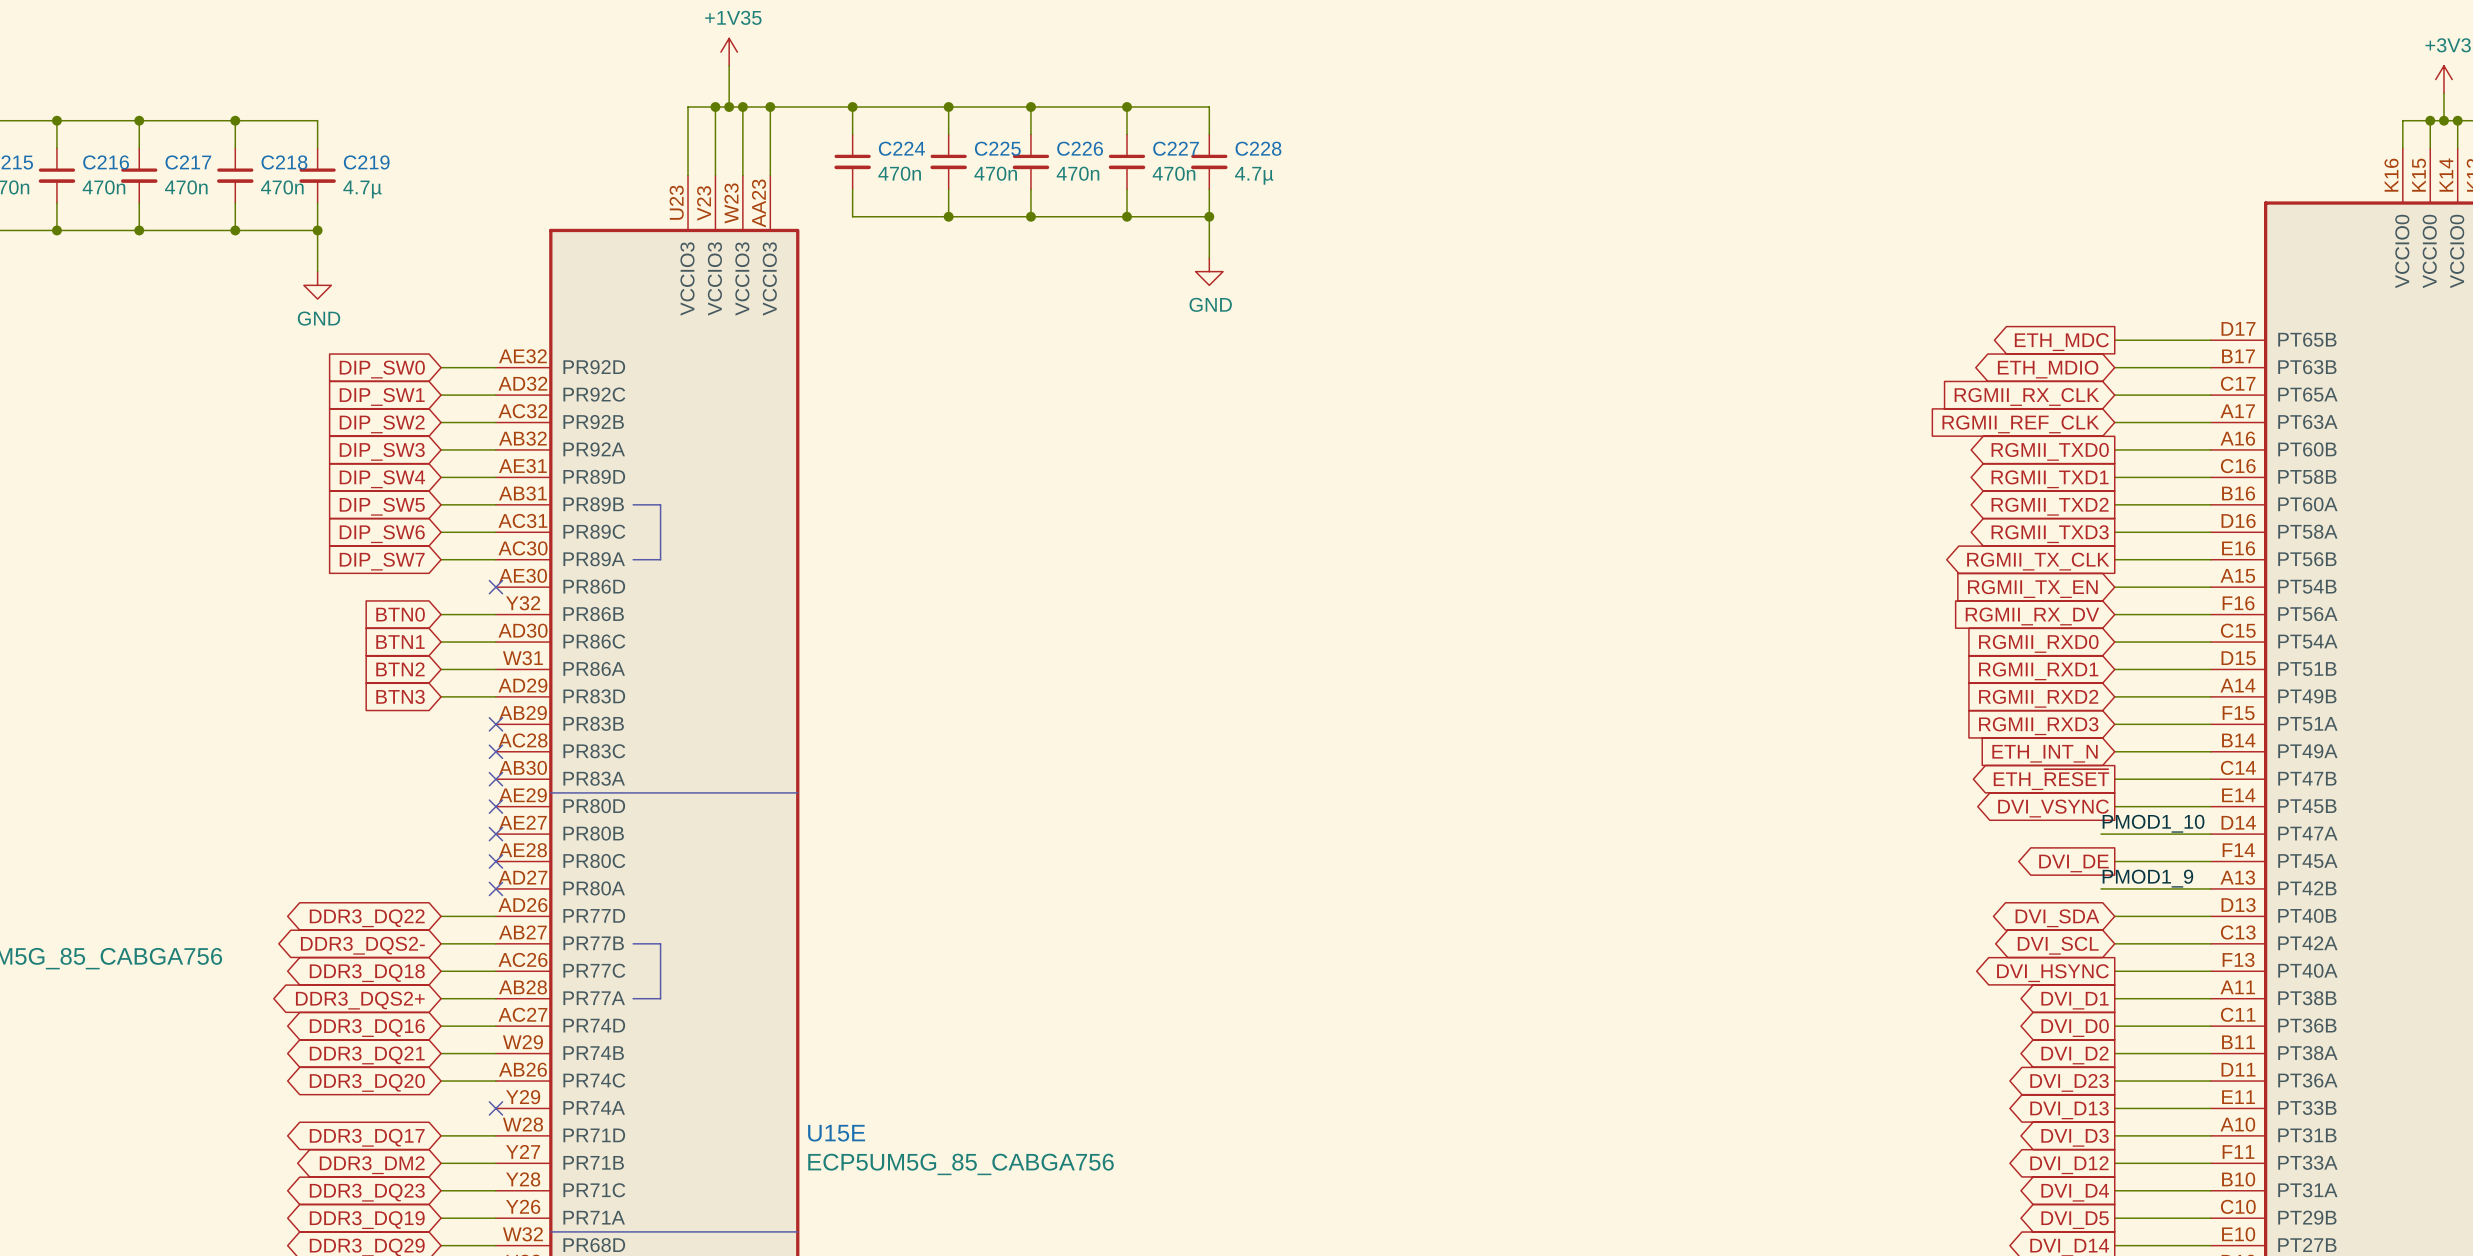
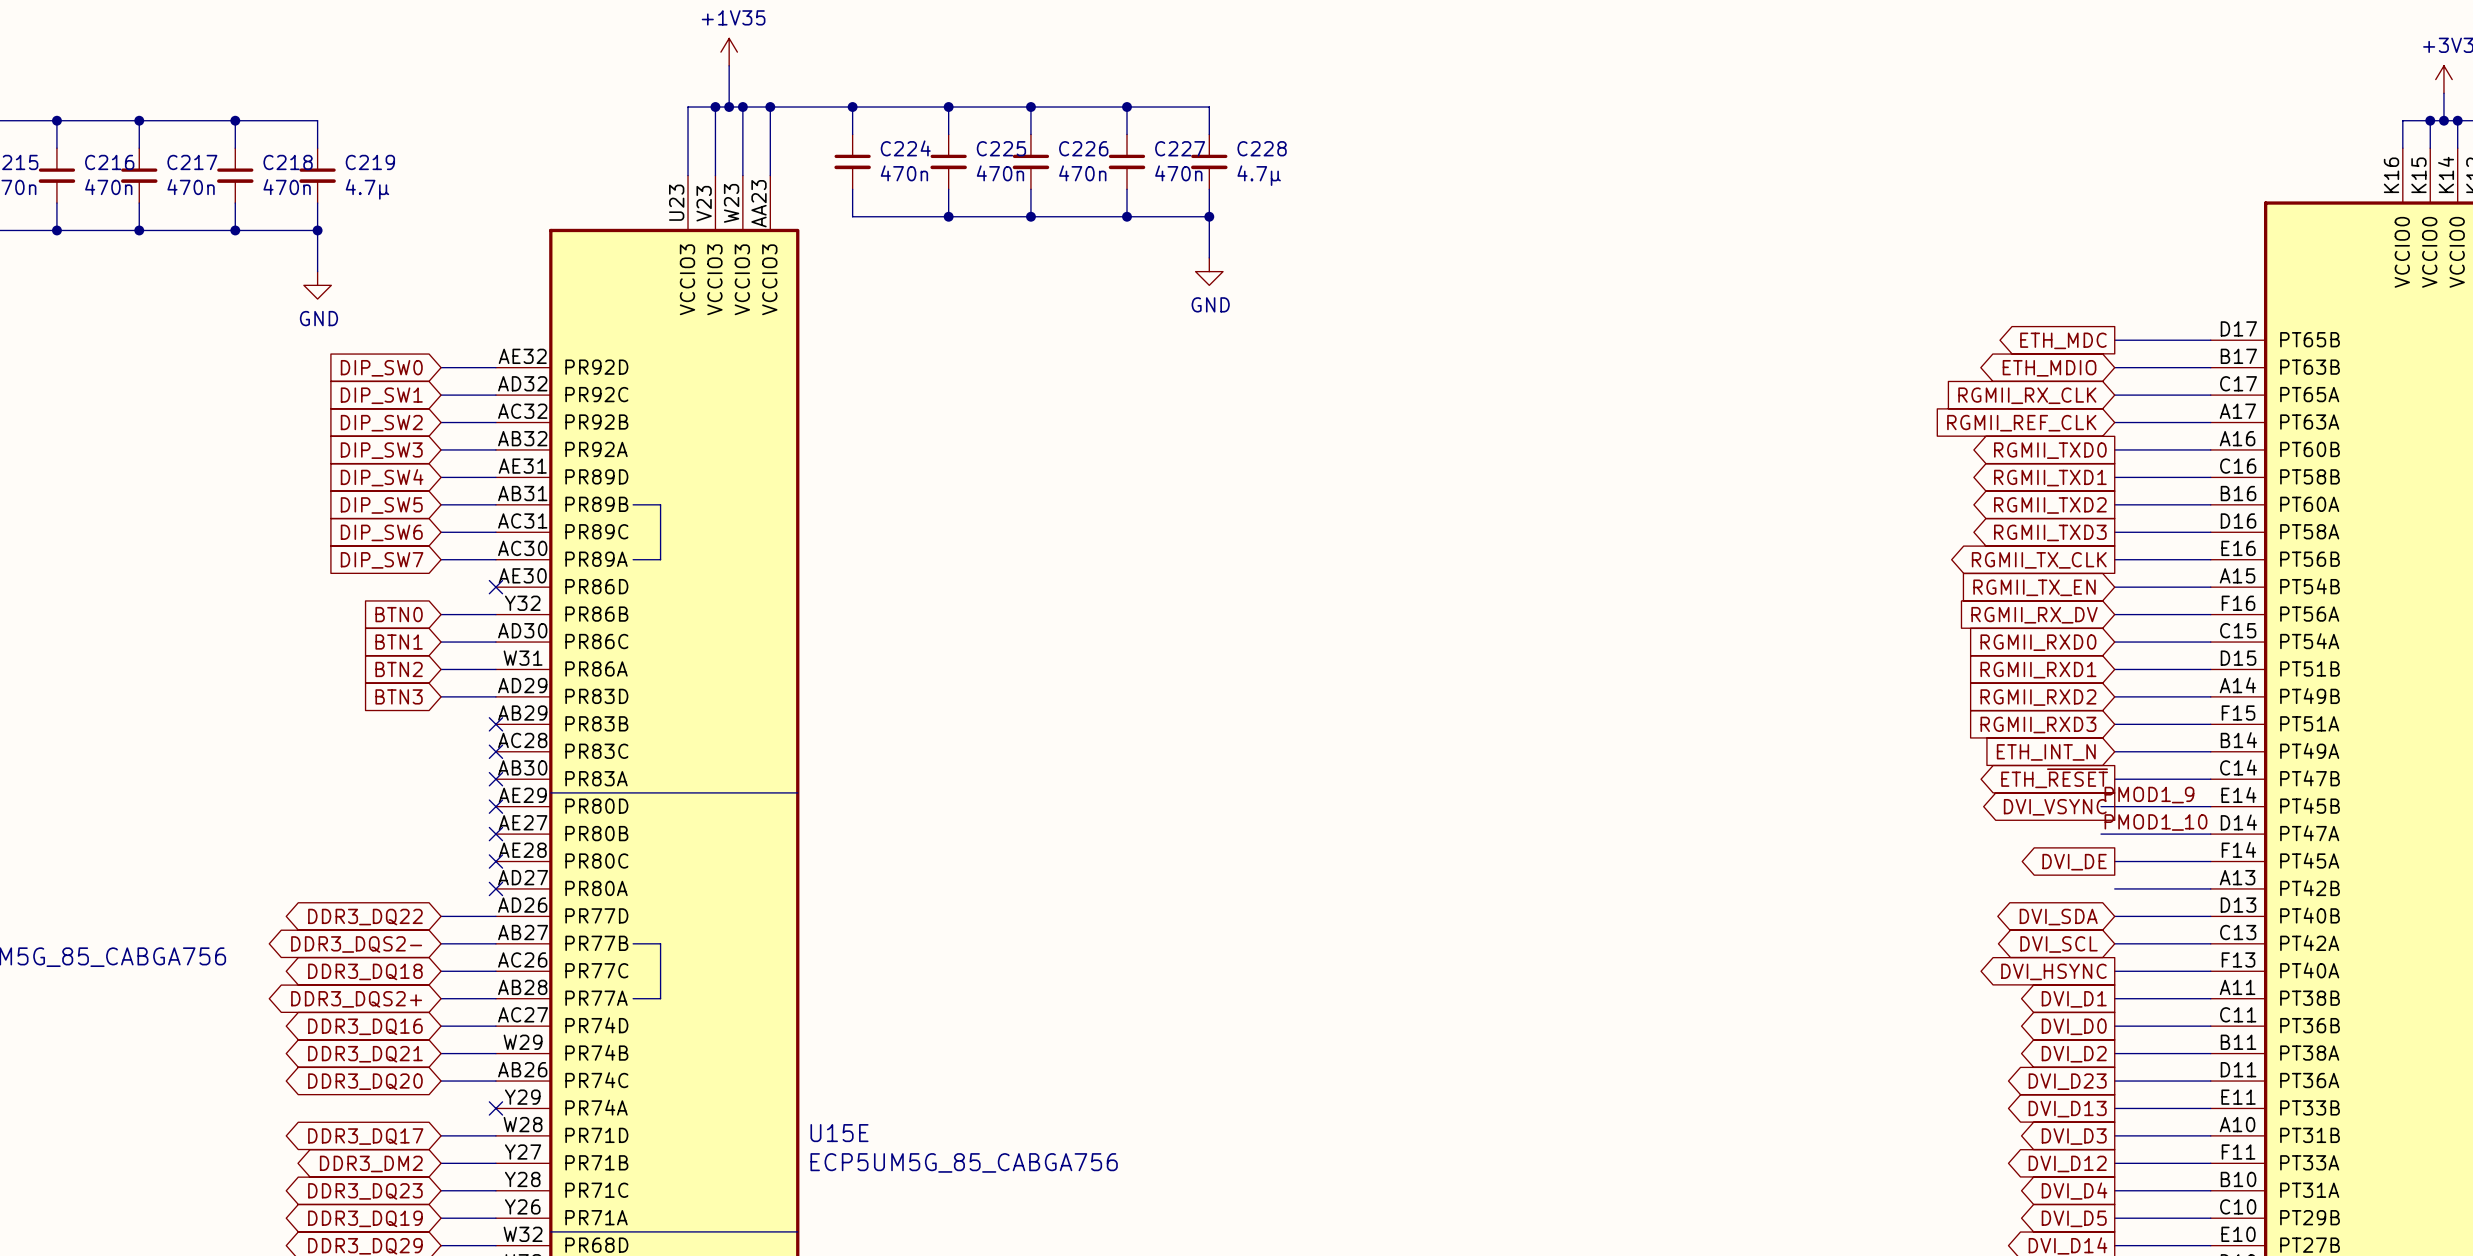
label position: PMOD1_9 (2147, 878) -> PMOD1_9 (2149, 795)
wire: (2101, 888) (2114, 888) -> (2101, 806) (2114, 806)

